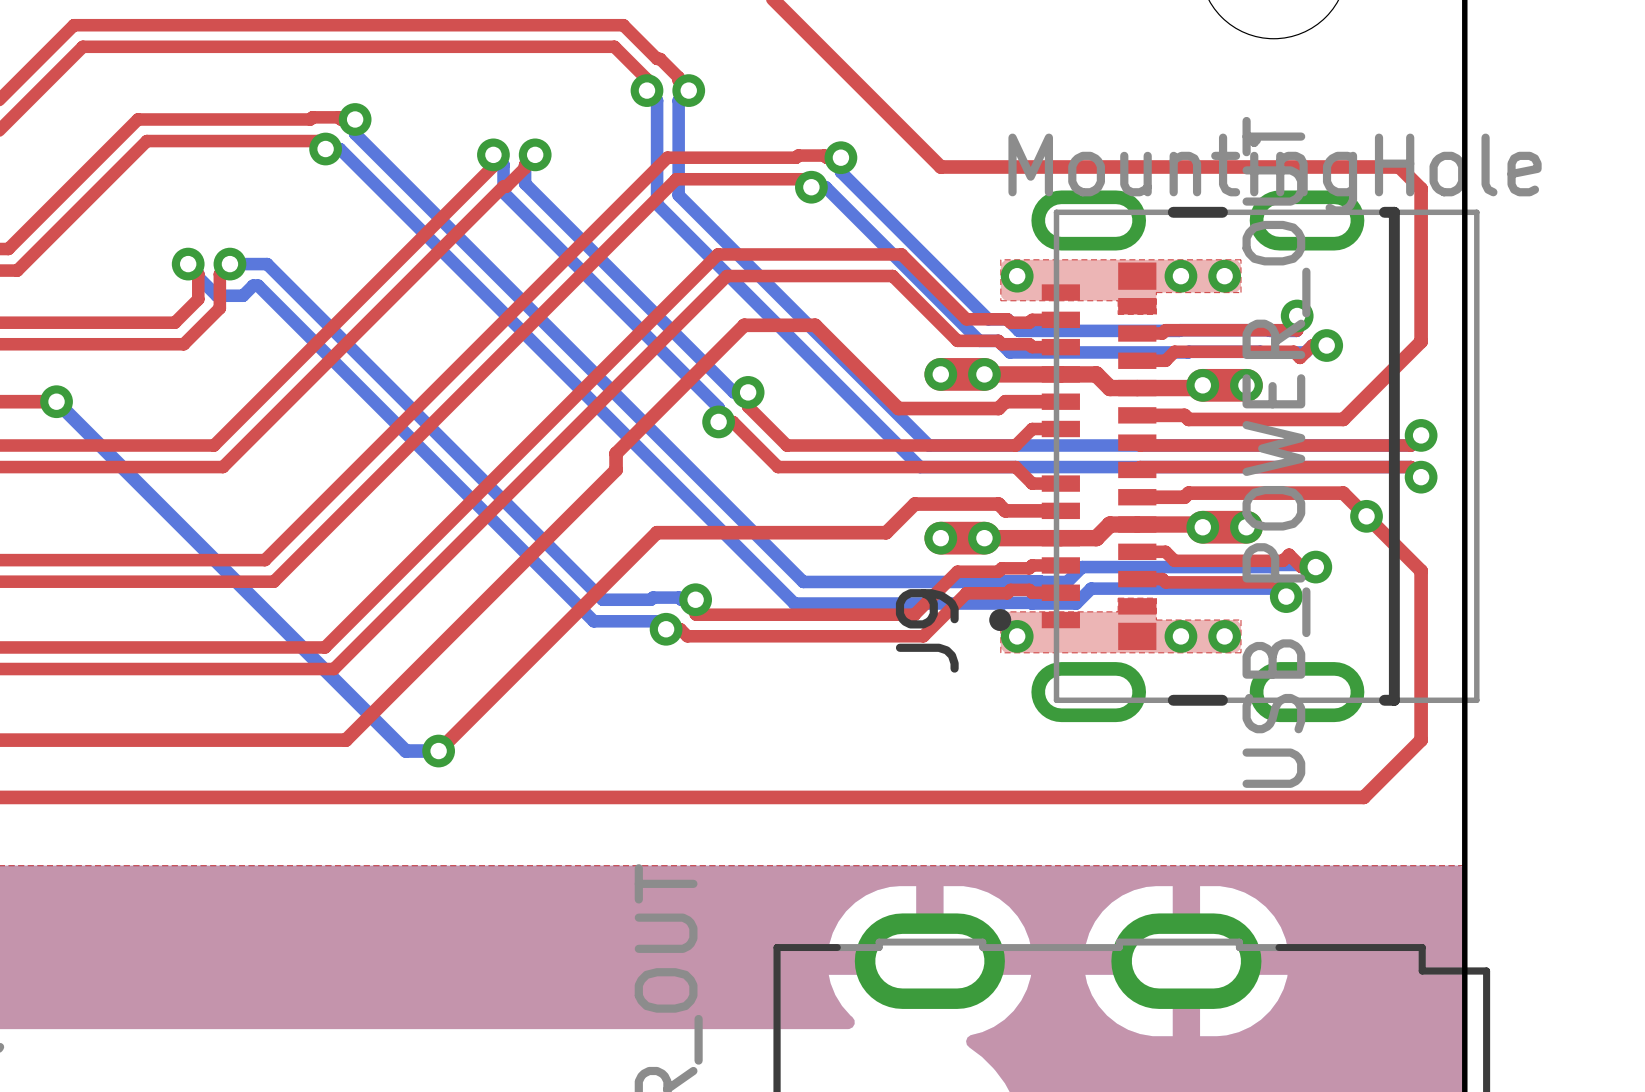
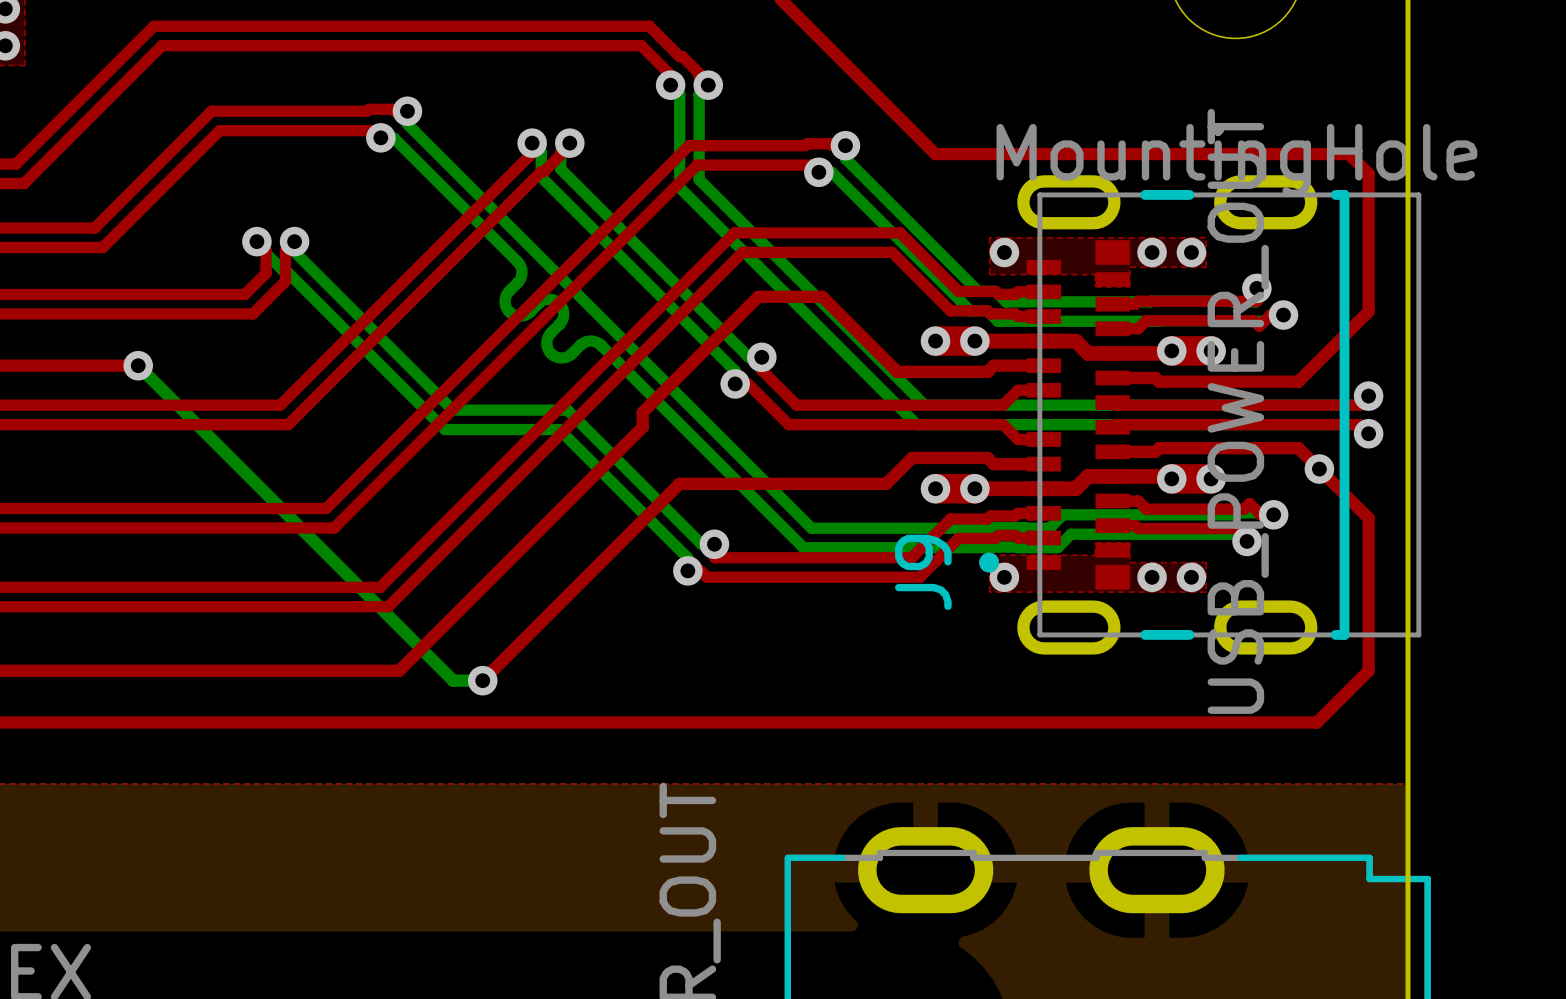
bottom track: (229, 264) (267, 264) (602, 599) (679, 597) -> (294, 241) (294, 251) (452, 410) (567, 410) (699, 542)
bottom track: (477, 286) (570, 379) -> (517, 261) (521, 273) (519, 280) (505, 296) (505, 304) (509, 311) (514, 315) (523, 315) (542, 300) (553, 300) (561, 306) (563, 314) (561, 321) (547, 338) (547, 346) (551, 353) (563, 357) (569, 355) (585, 341) (594, 341) (601, 345)
bottom track: (219, 295) (243, 295) (253, 285) (258, 285) (593, 621) (658, 621) (666, 629) -> (285, 270) (444, 429) (559, 429) (687, 558) (687, 570)

